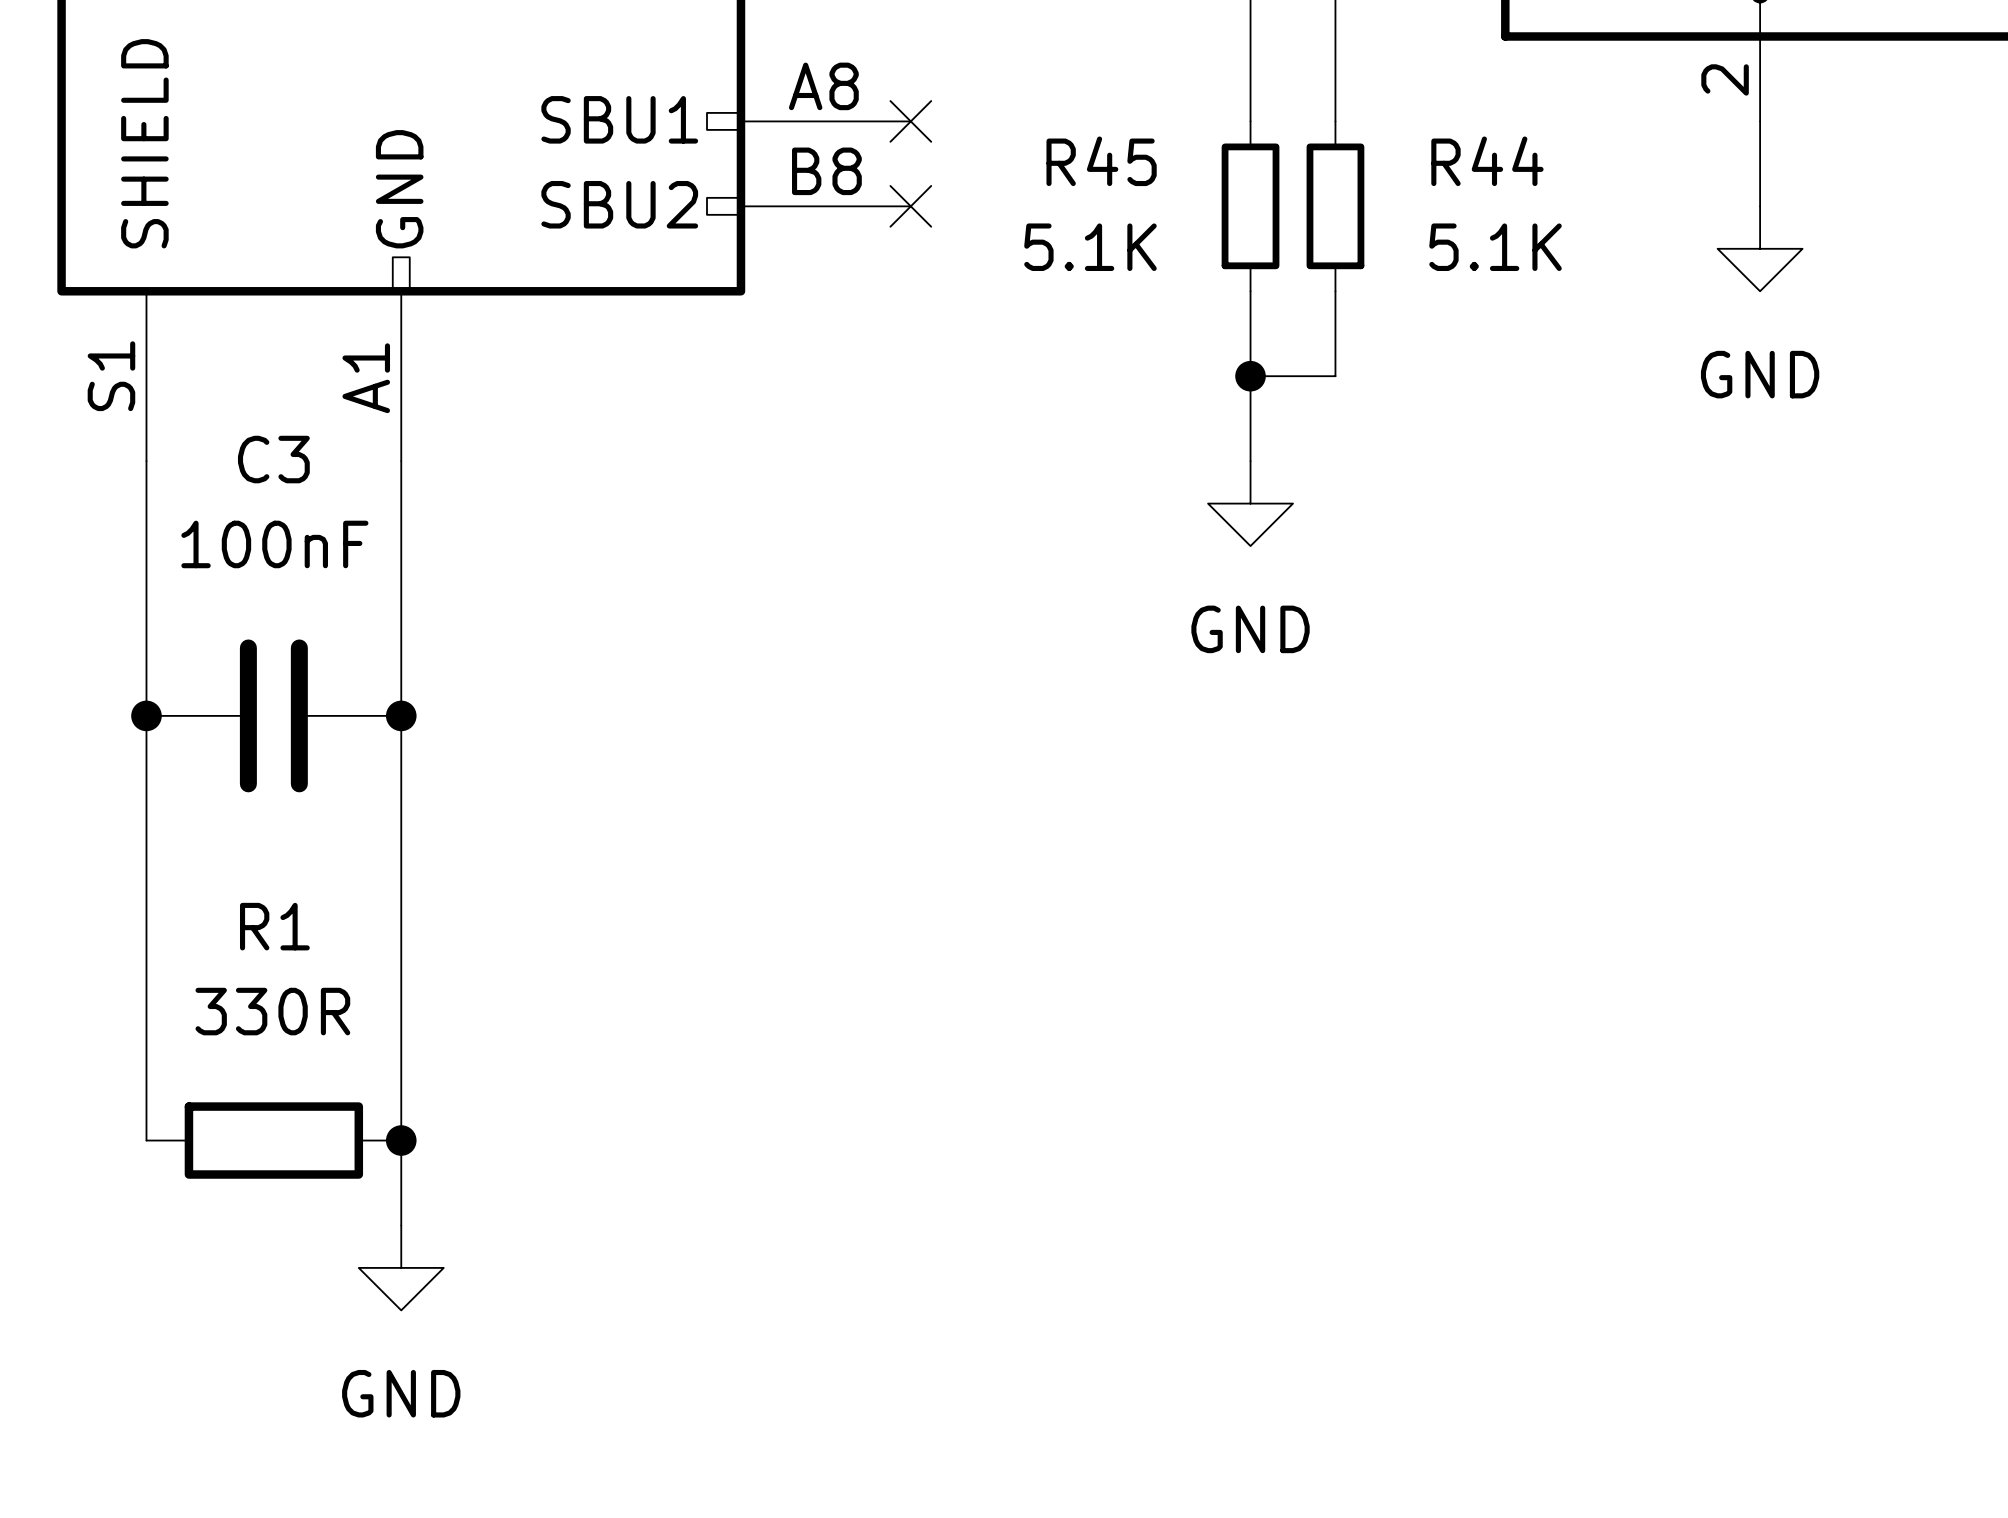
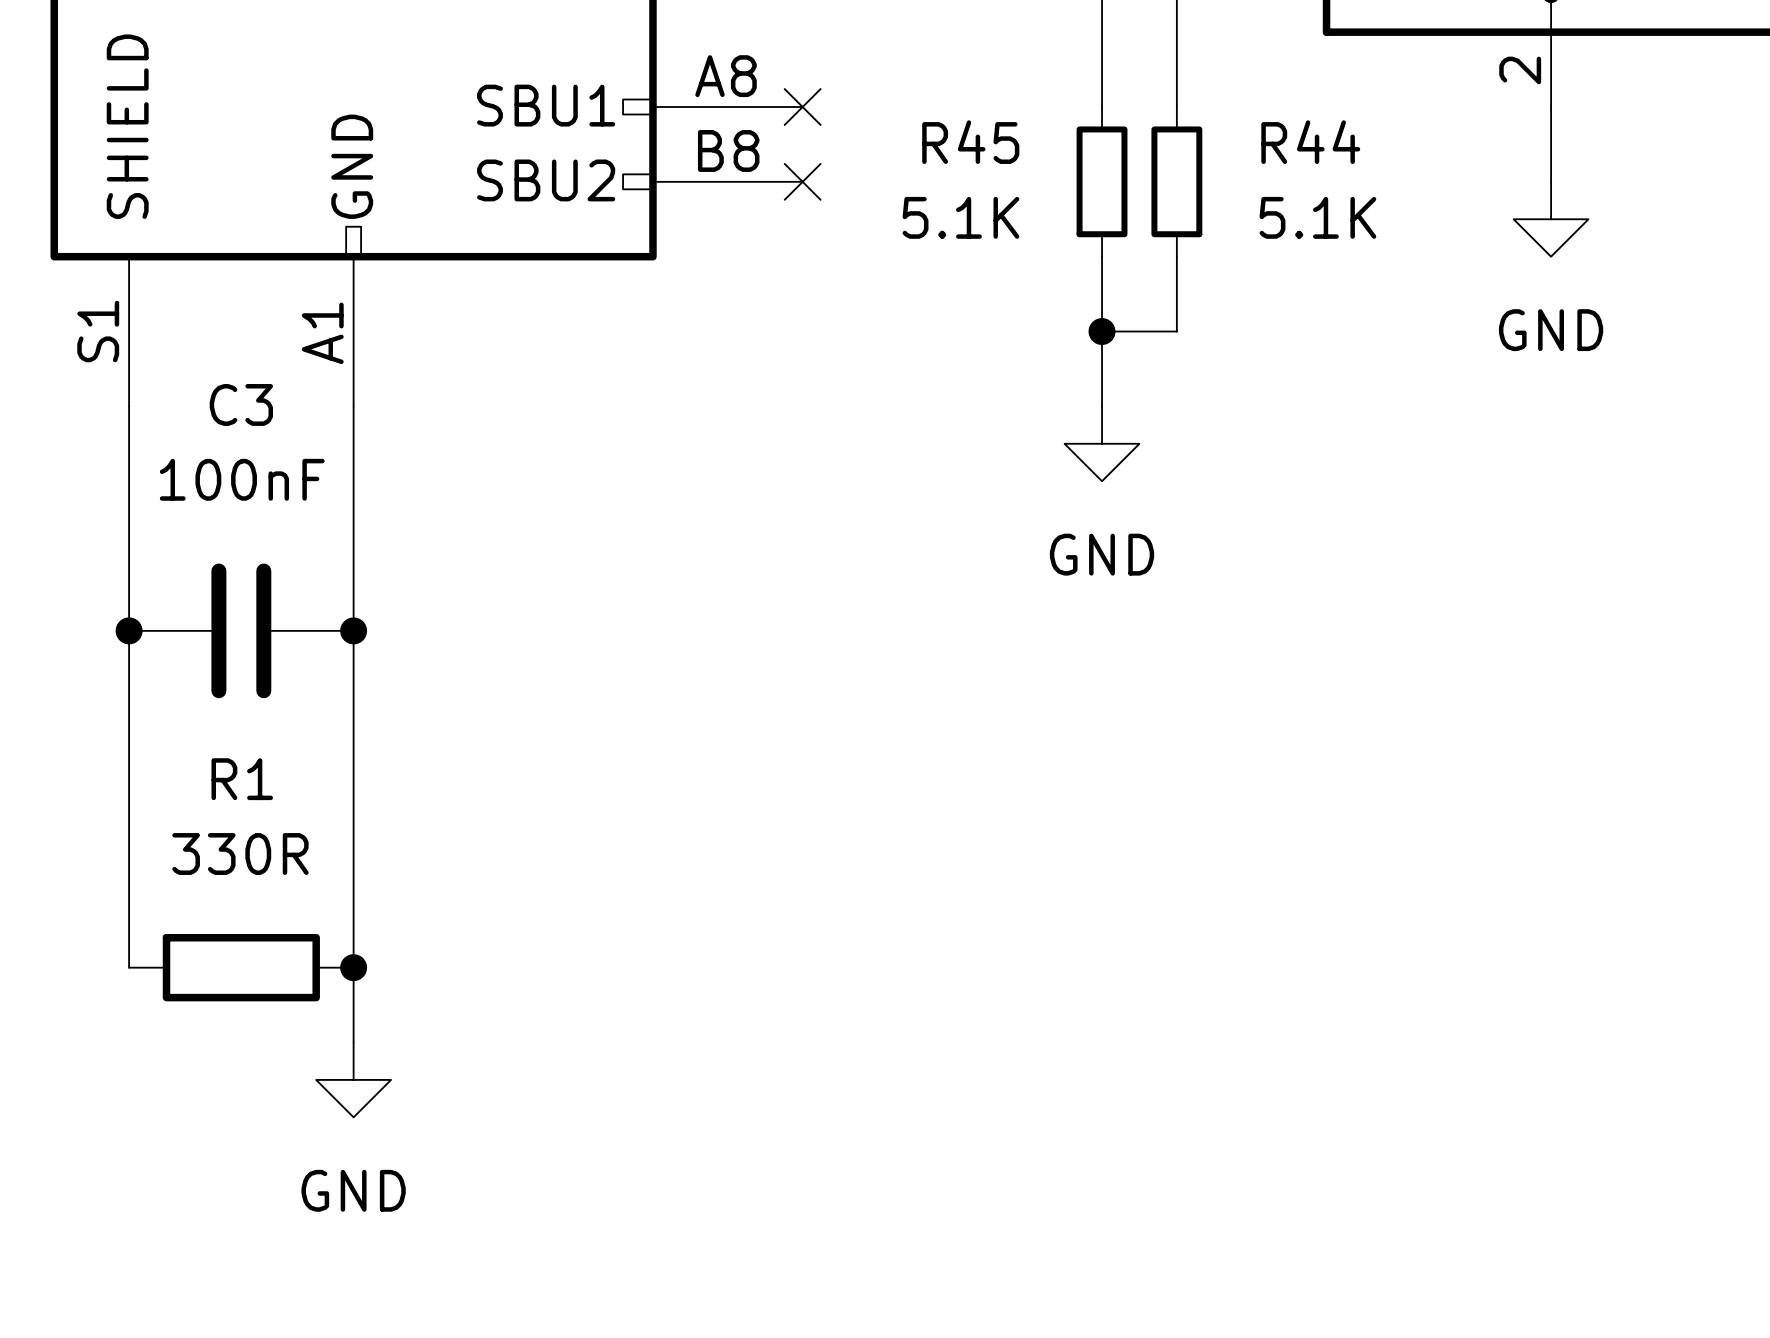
wire: (146, 1098) (146, 1140) -> none
R1 position: (273, 1140) -> (241, 967)
junction position: (401, 1140) -> (353, 967)
power symbol position: GND (401, 1267) -> GND (353, 1079)

